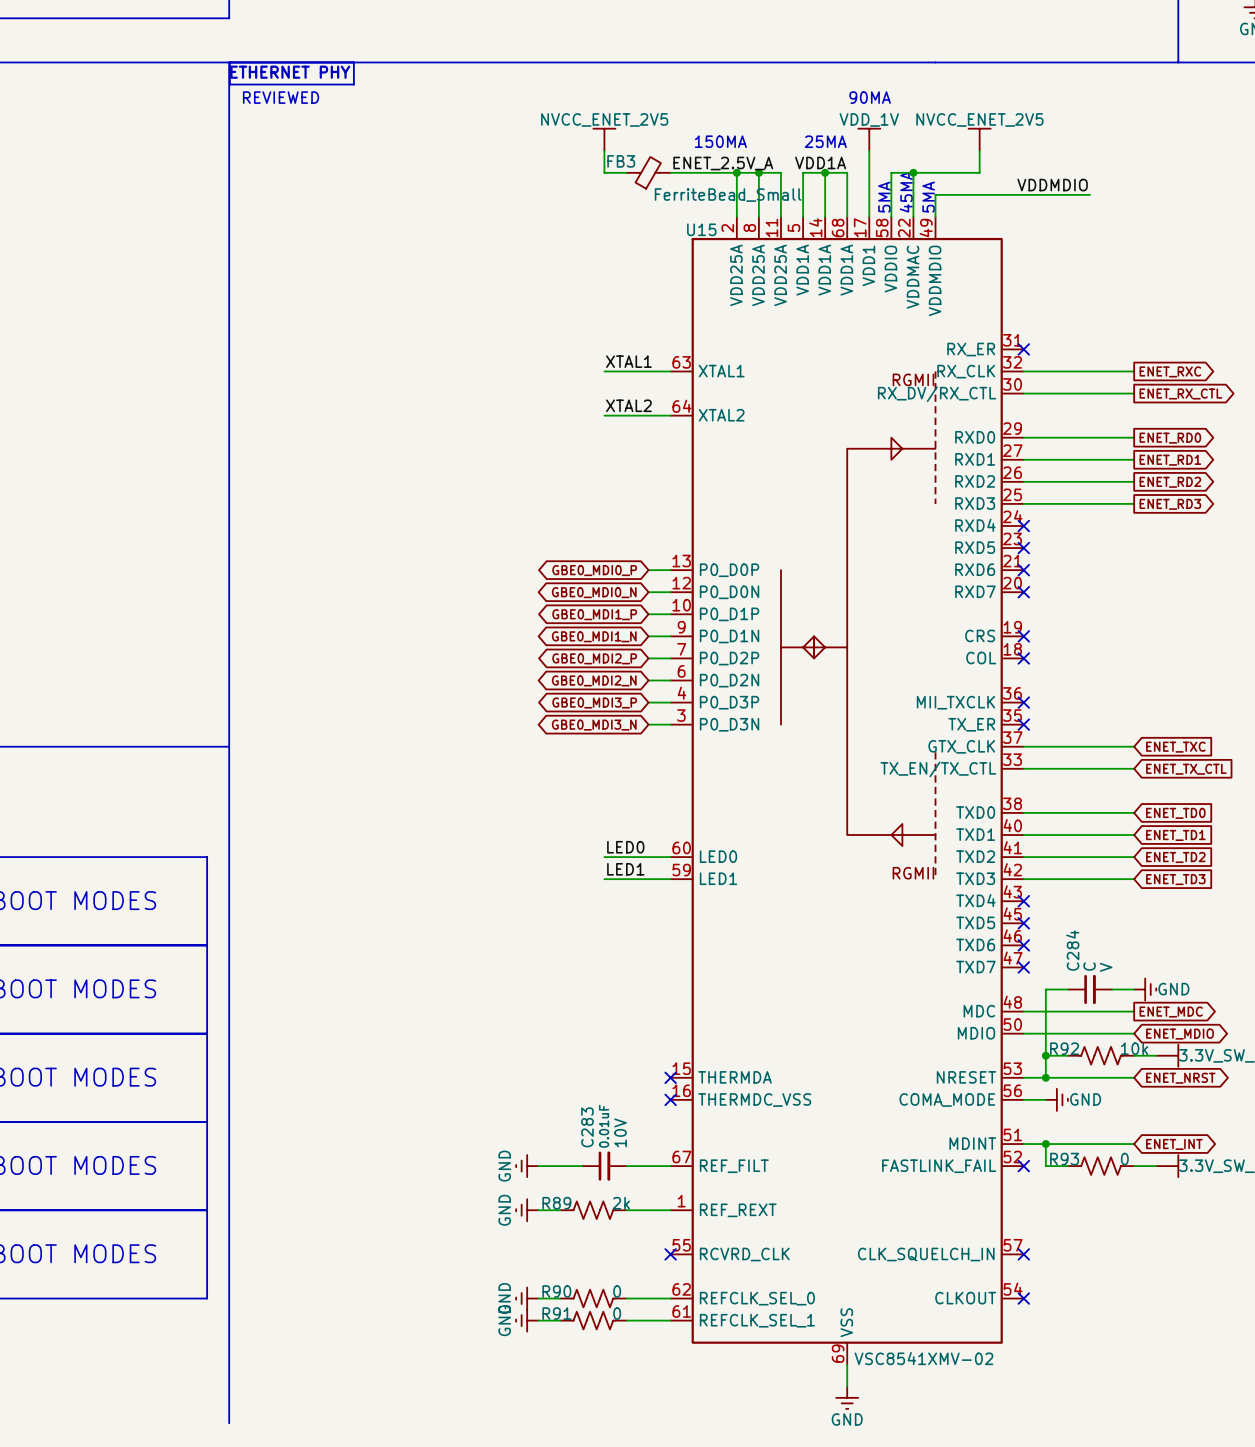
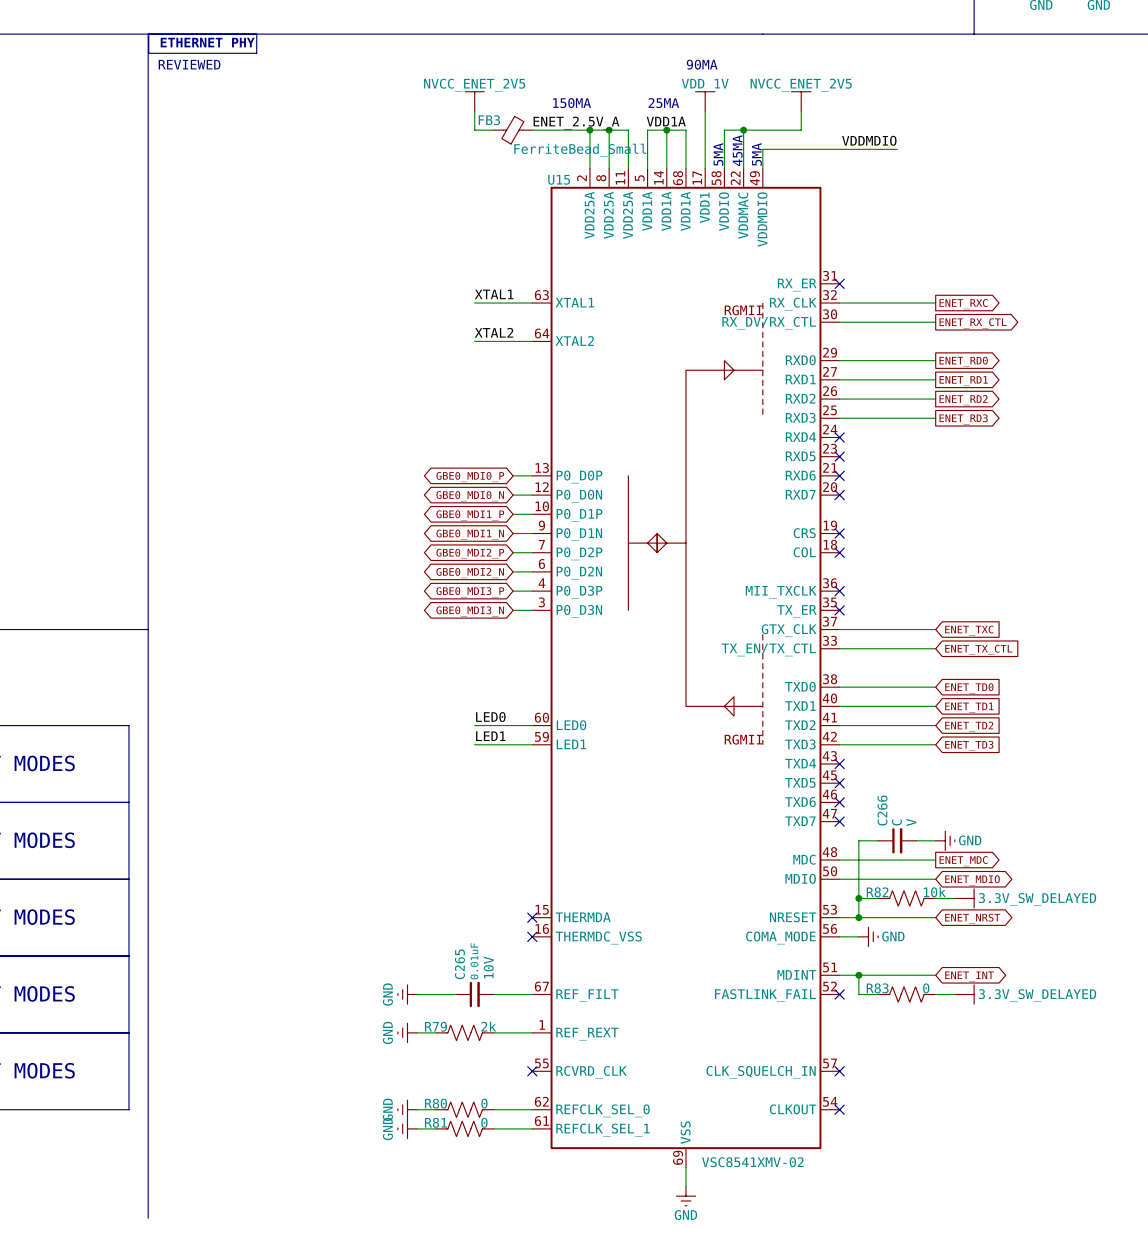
C284 name: C284 (1072, 950) -> C266 (882, 810)
R92 name: R92 (1064, 1048) -> R82 (877, 892)
C283 name: C283 (587, 1127) -> C265 (459, 964)
R93 name: R93 (1064, 1159) -> R83 (877, 988)
R89 name: R89 (556, 1203) -> R79 (435, 1026)
R90 name: R90 (556, 1291) -> R80 (435, 1103)
R91 name: R91 (556, 1313) -> R81 (435, 1122)

